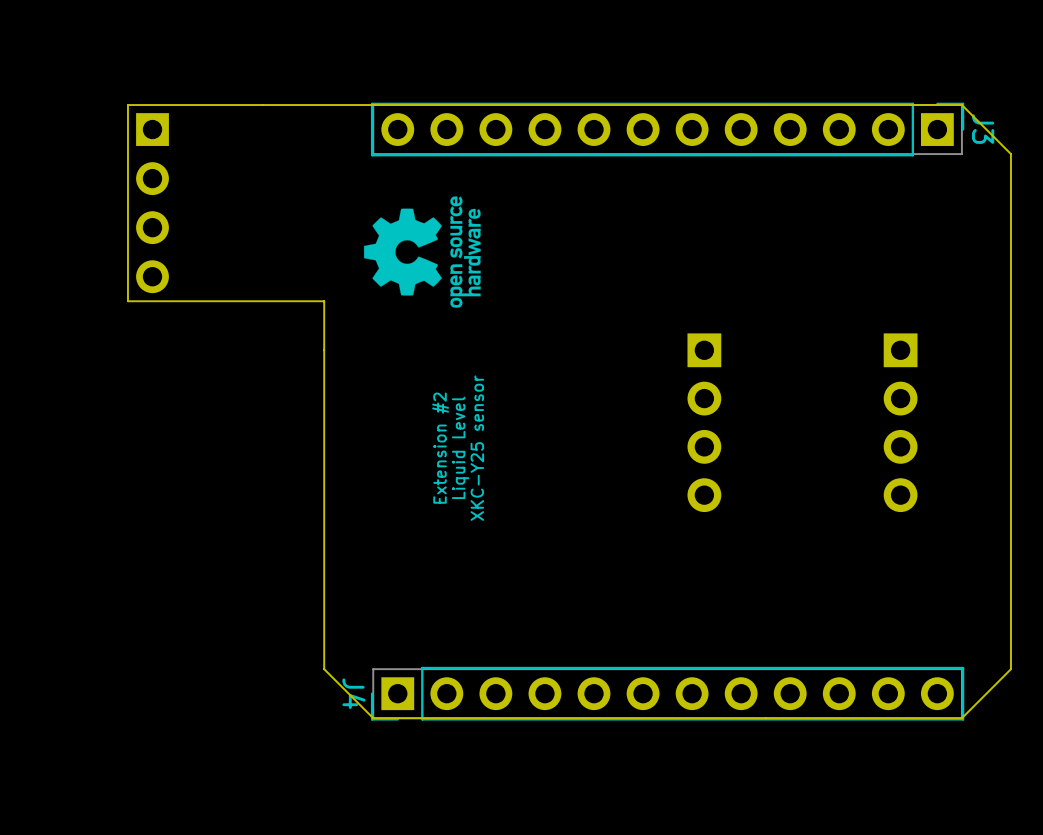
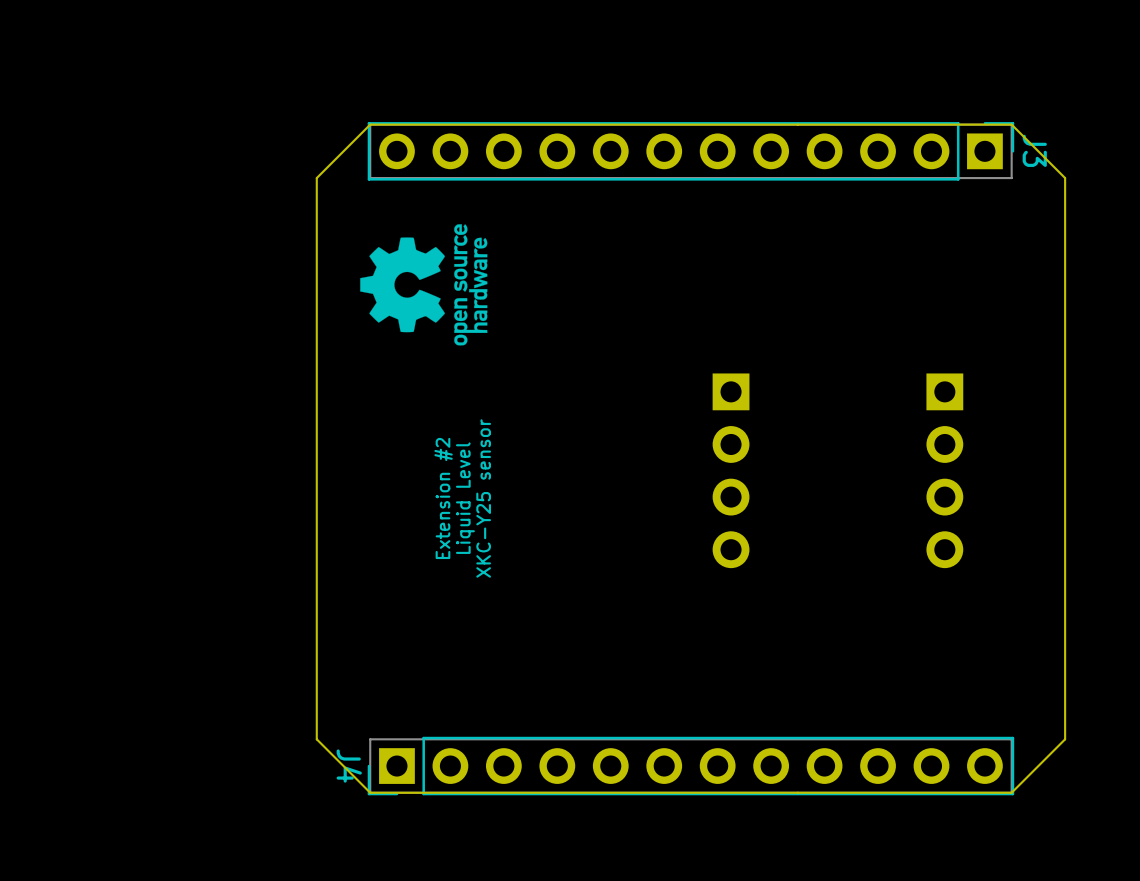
board edge: (373, 105) (127, 105) (127, 301) (324, 301) -> (370, 124) (316, 178) (316, 338)
part: (152, 203) -> none

